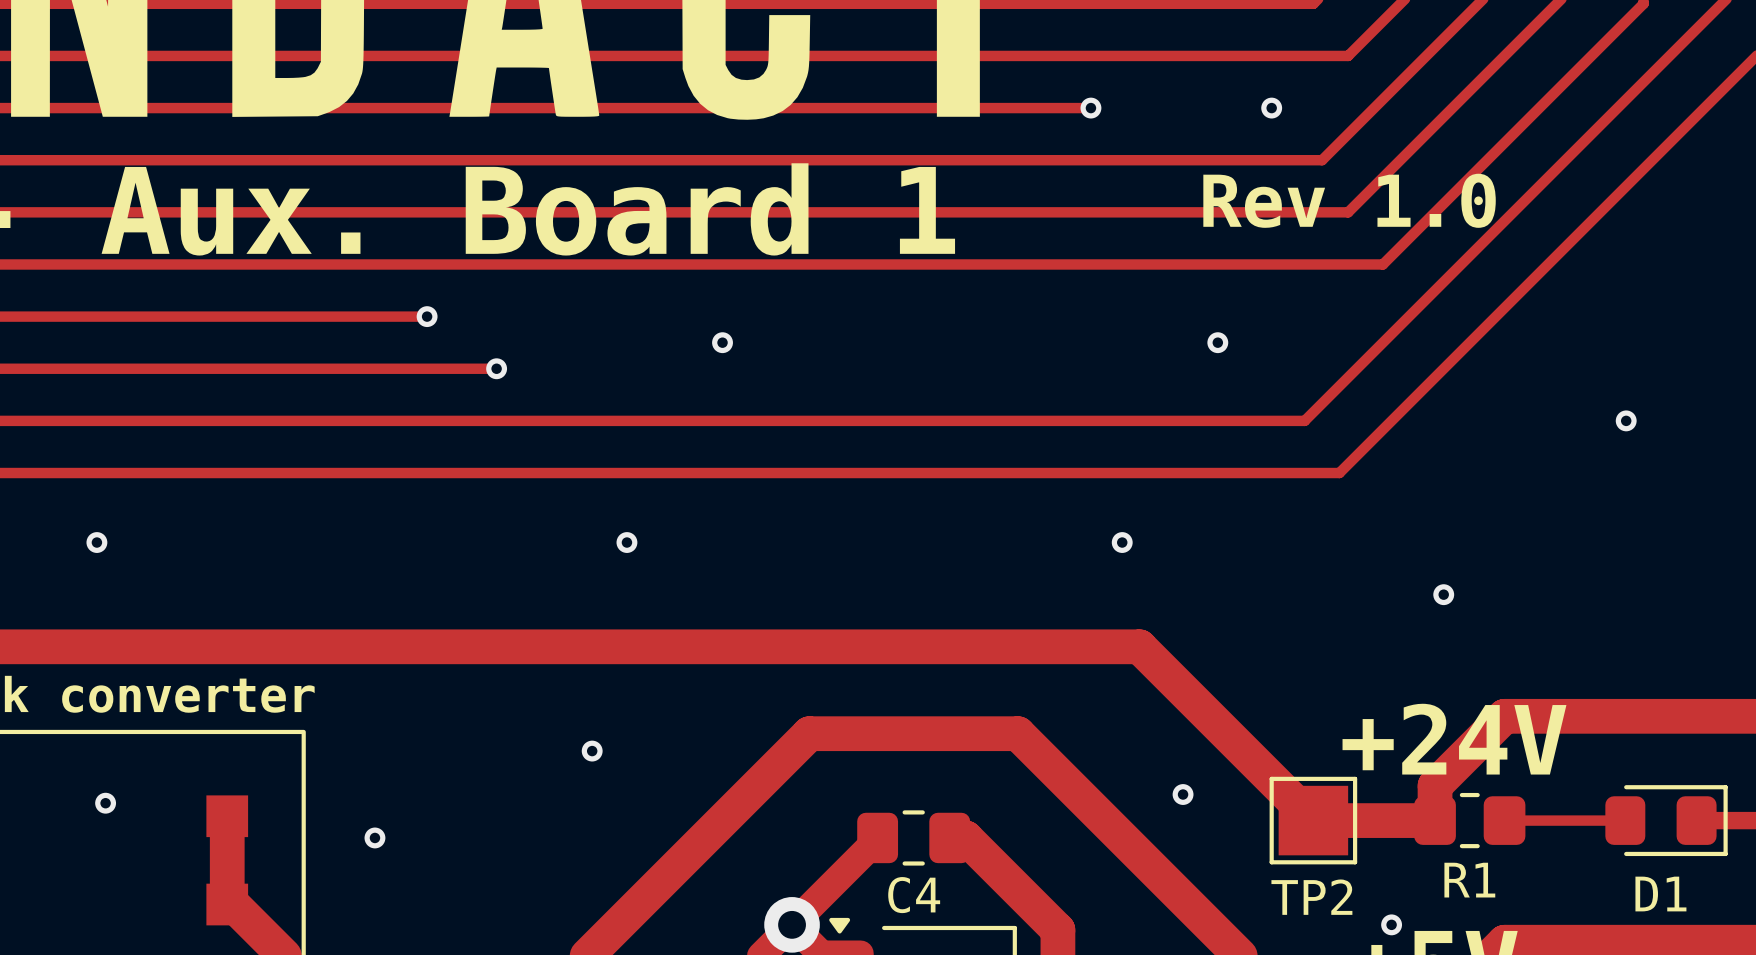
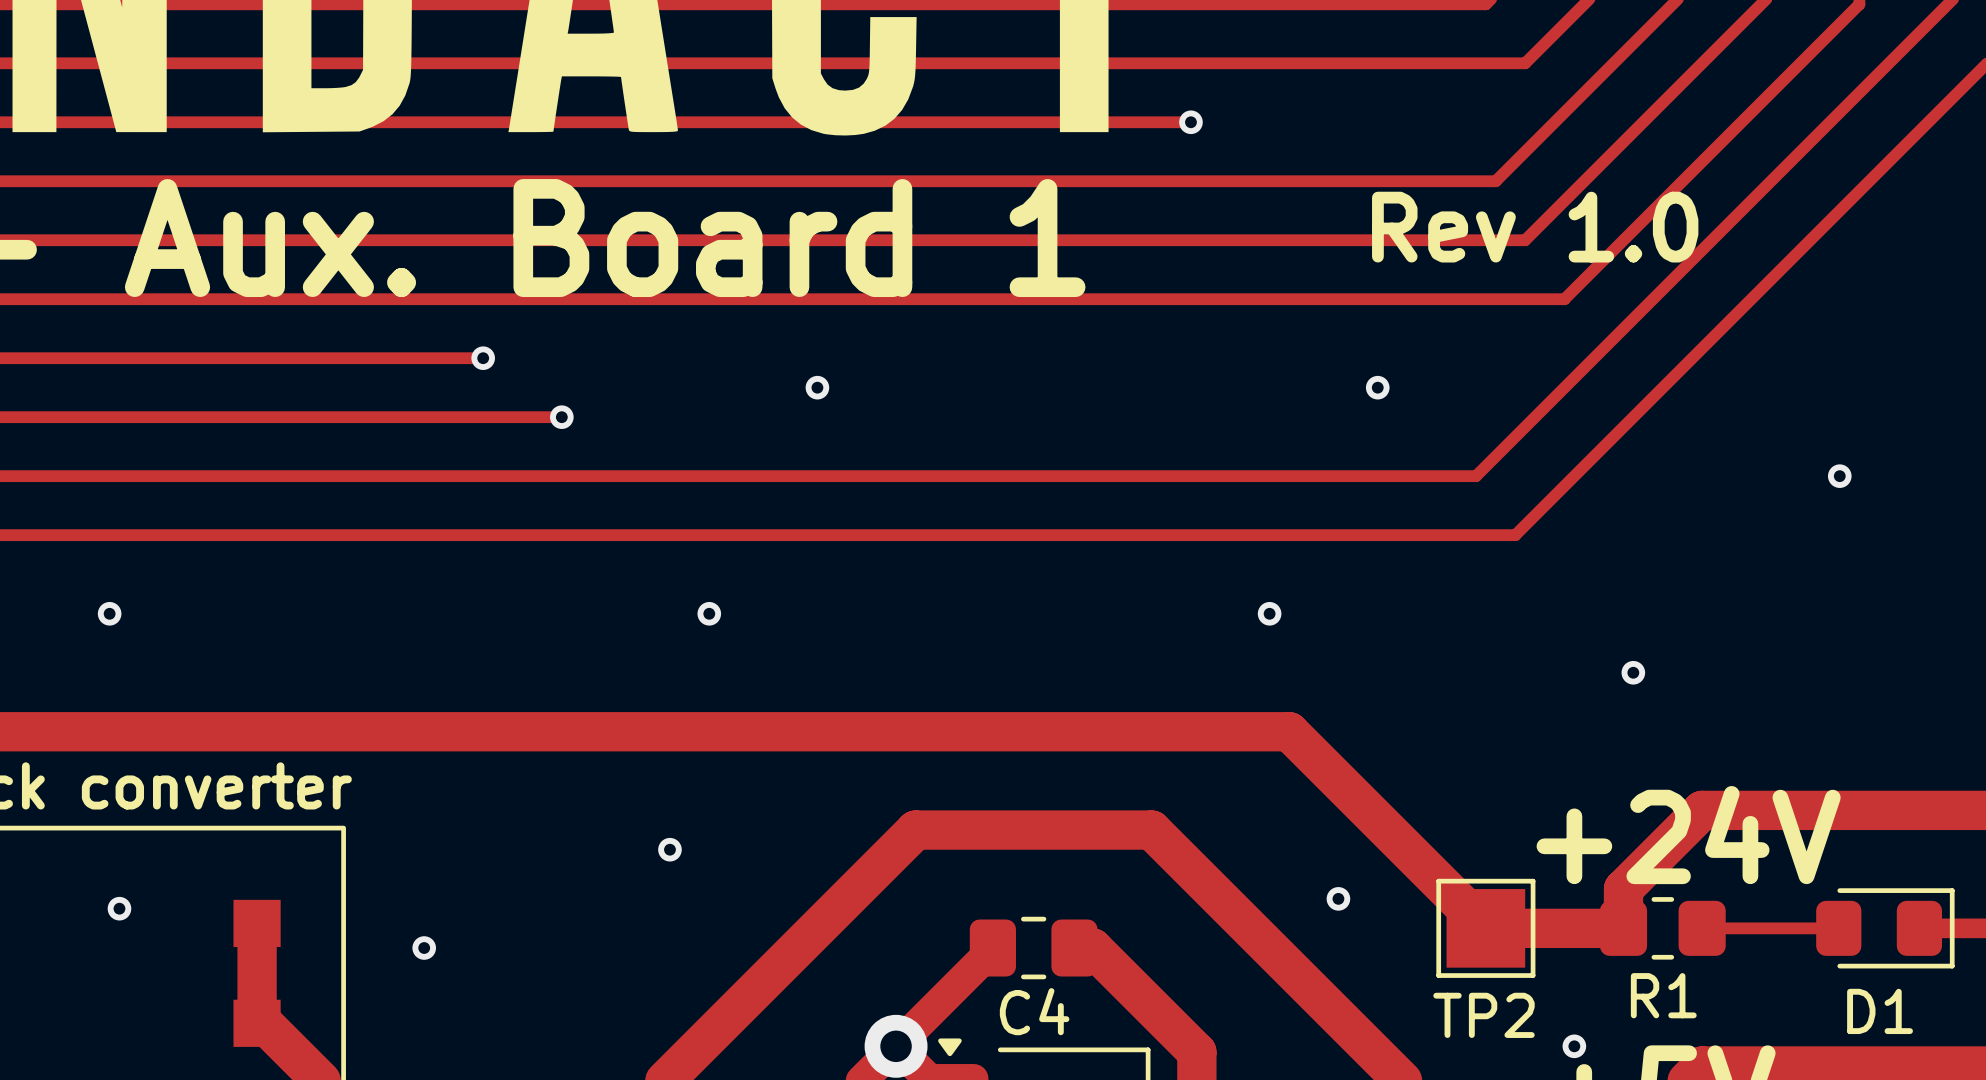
track: (1052, 108) (1090, 108) -> none
via position: (1090, 108) -> (1190, 122)
via: (1271, 108) -> none

